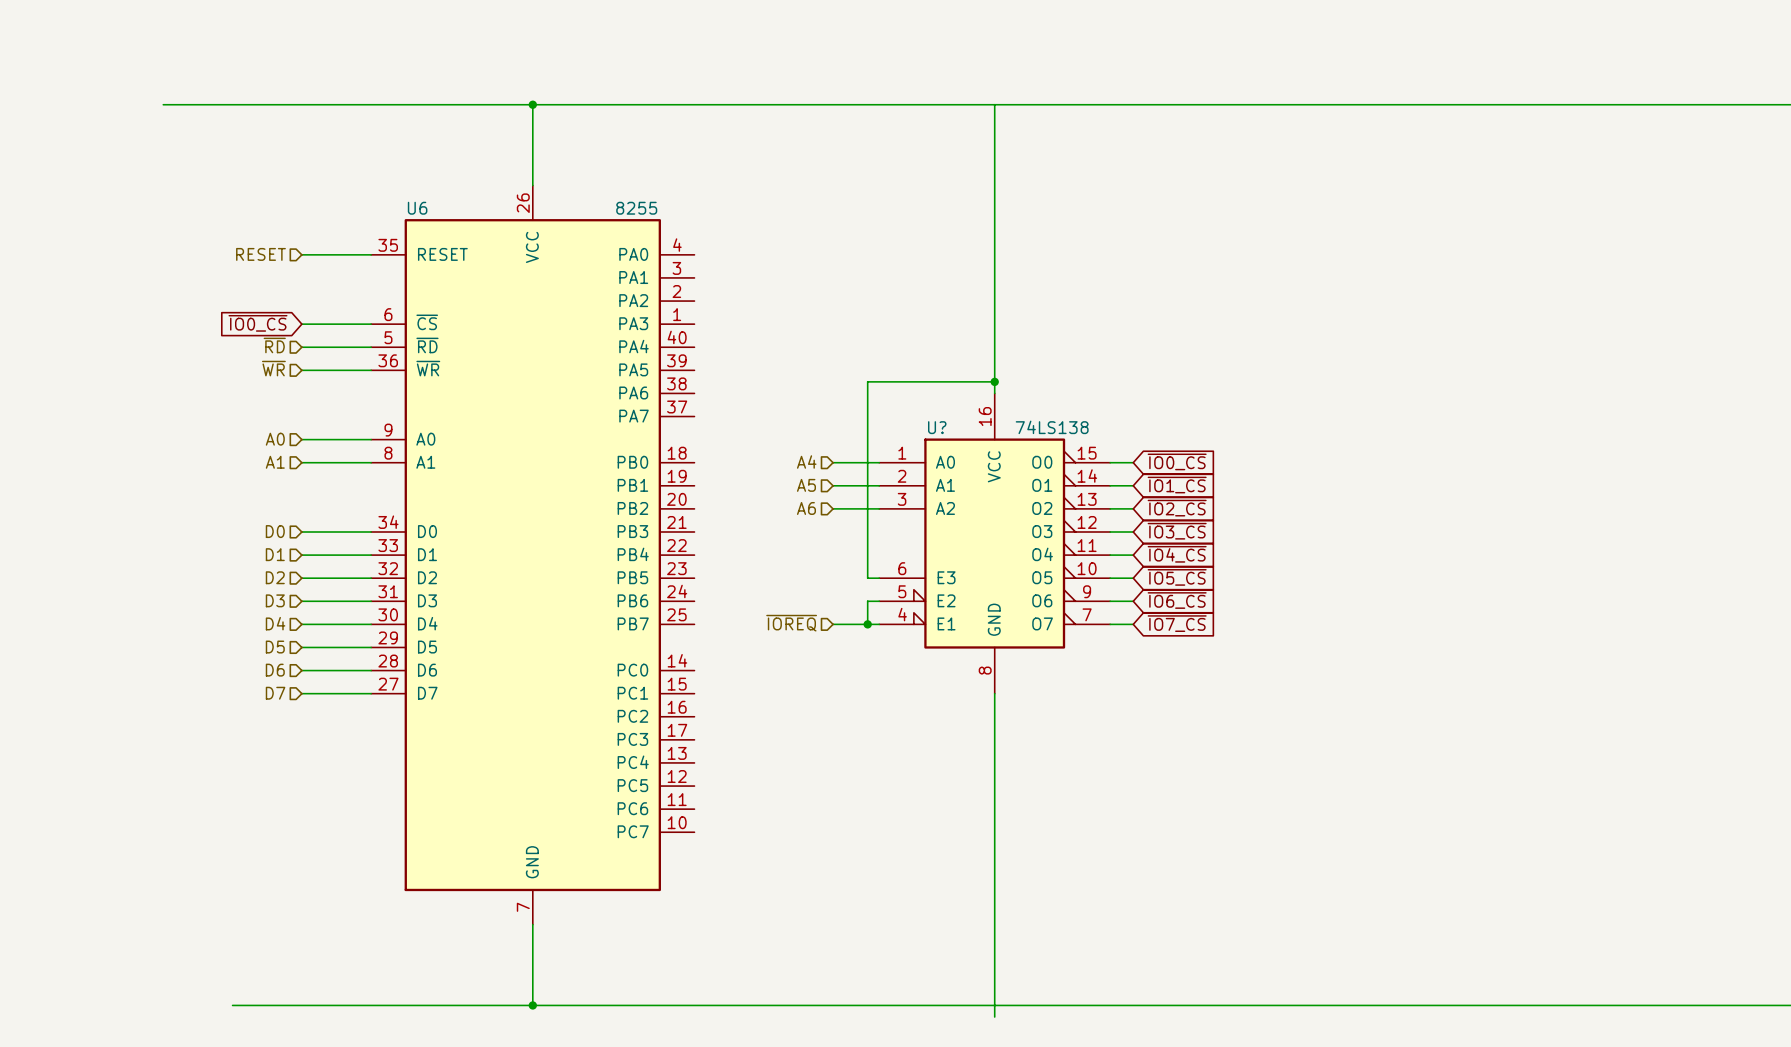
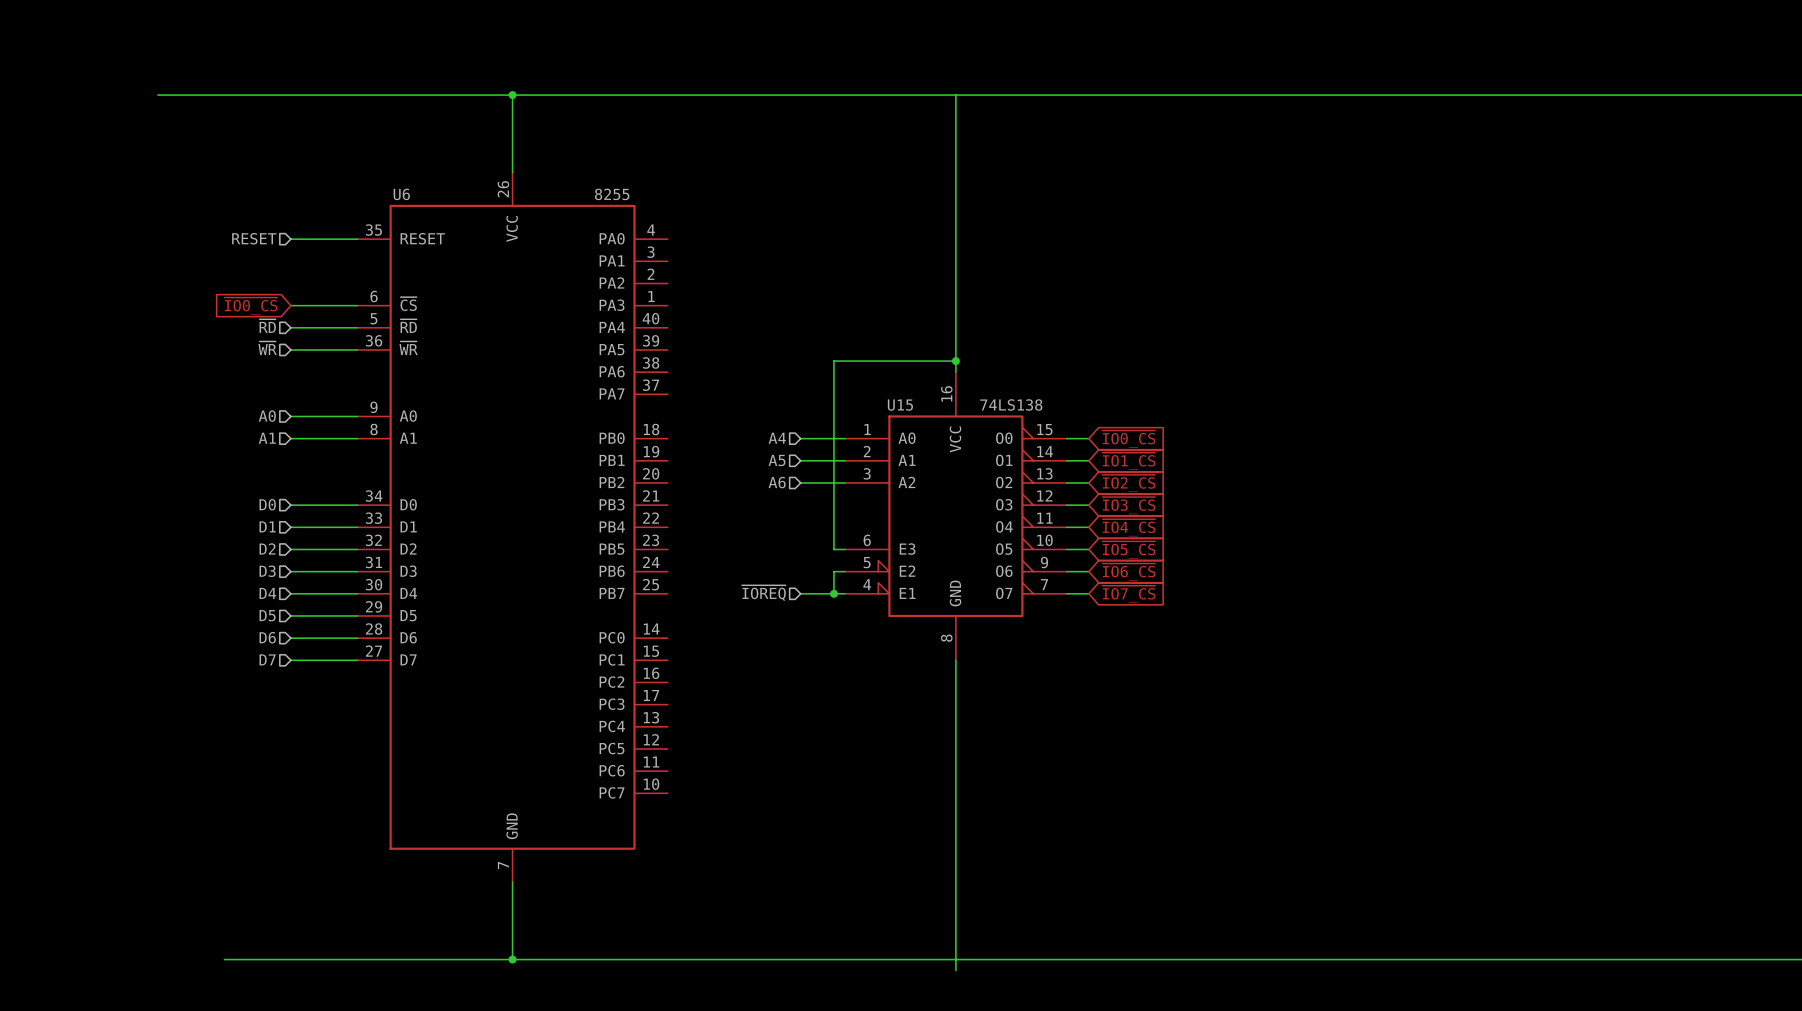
U? name: U? (937, 427) -> U15 (900, 405)

